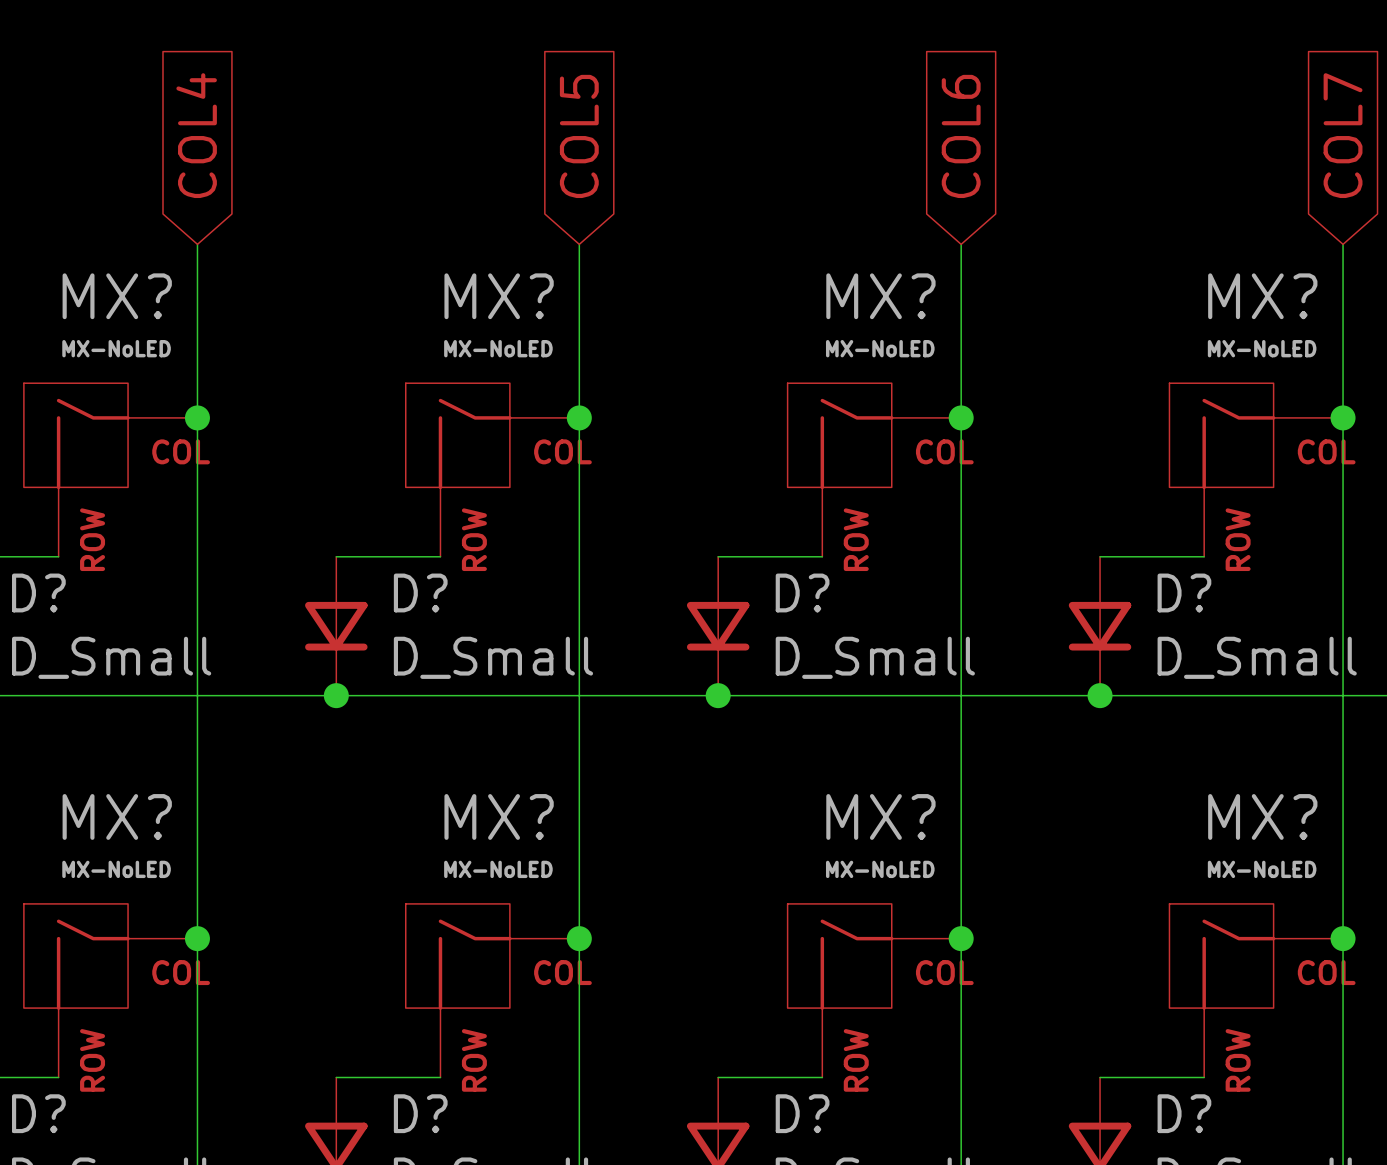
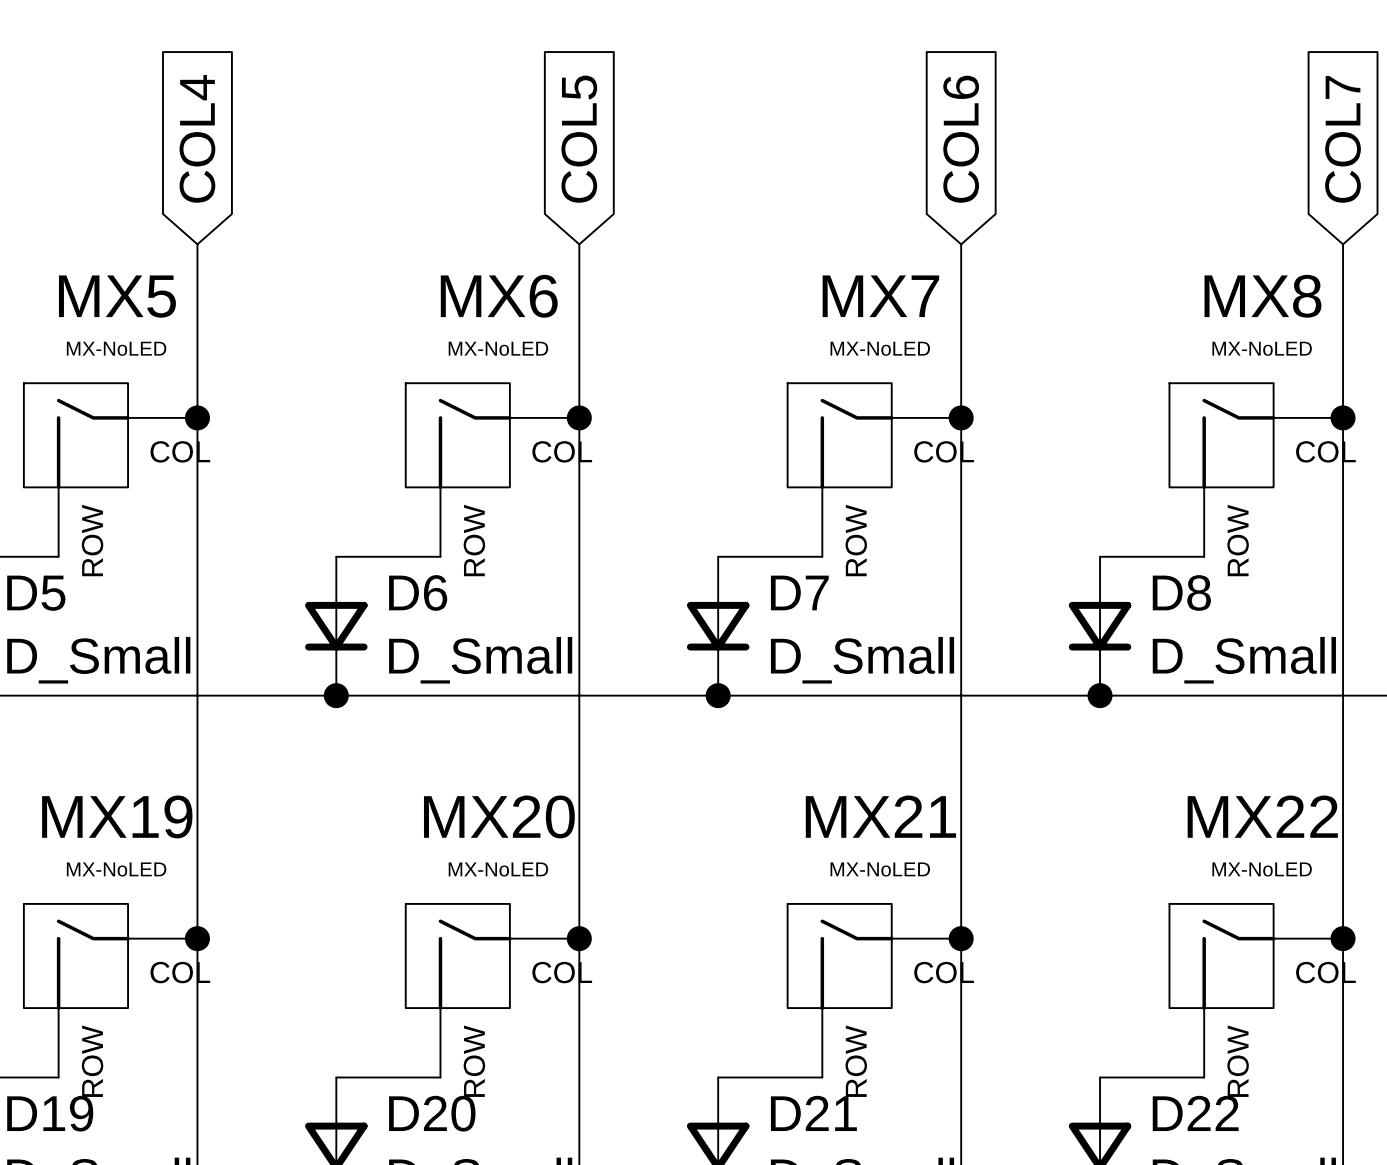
MX? name: MX? (117, 296) -> MX5 (117, 296)
MX? name: MX? (499, 296) -> MX6 (499, 296)
MX? name: MX? (880, 296) -> MX7 (880, 296)
MX? name: MX? (1262, 296) -> MX8 (1262, 296)
D? name: D? (38, 592) -> D5 (36, 593)
D? name: D? (420, 592) -> D6 (418, 592)
D? name: D? (802, 592) -> D7 (799, 592)
D? name: D? (1184, 592) -> D8 (1181, 592)
MX? name: MX? (117, 816) -> MX19 (117, 816)
MX? name: MX? (499, 816) -> MX20 (499, 816)
MX? name: MX? (880, 816) -> MX21 (880, 816)
MX? name: MX? (1262, 816) -> MX22 (1262, 816)
D? name: D? (38, 1113) -> D19 (50, 1113)
D? name: D? (420, 1113) -> D20 (432, 1113)
D? name: D? (802, 1113) -> D21 (813, 1113)
D? name: D? (1184, 1113) -> D22 (1195, 1113)

